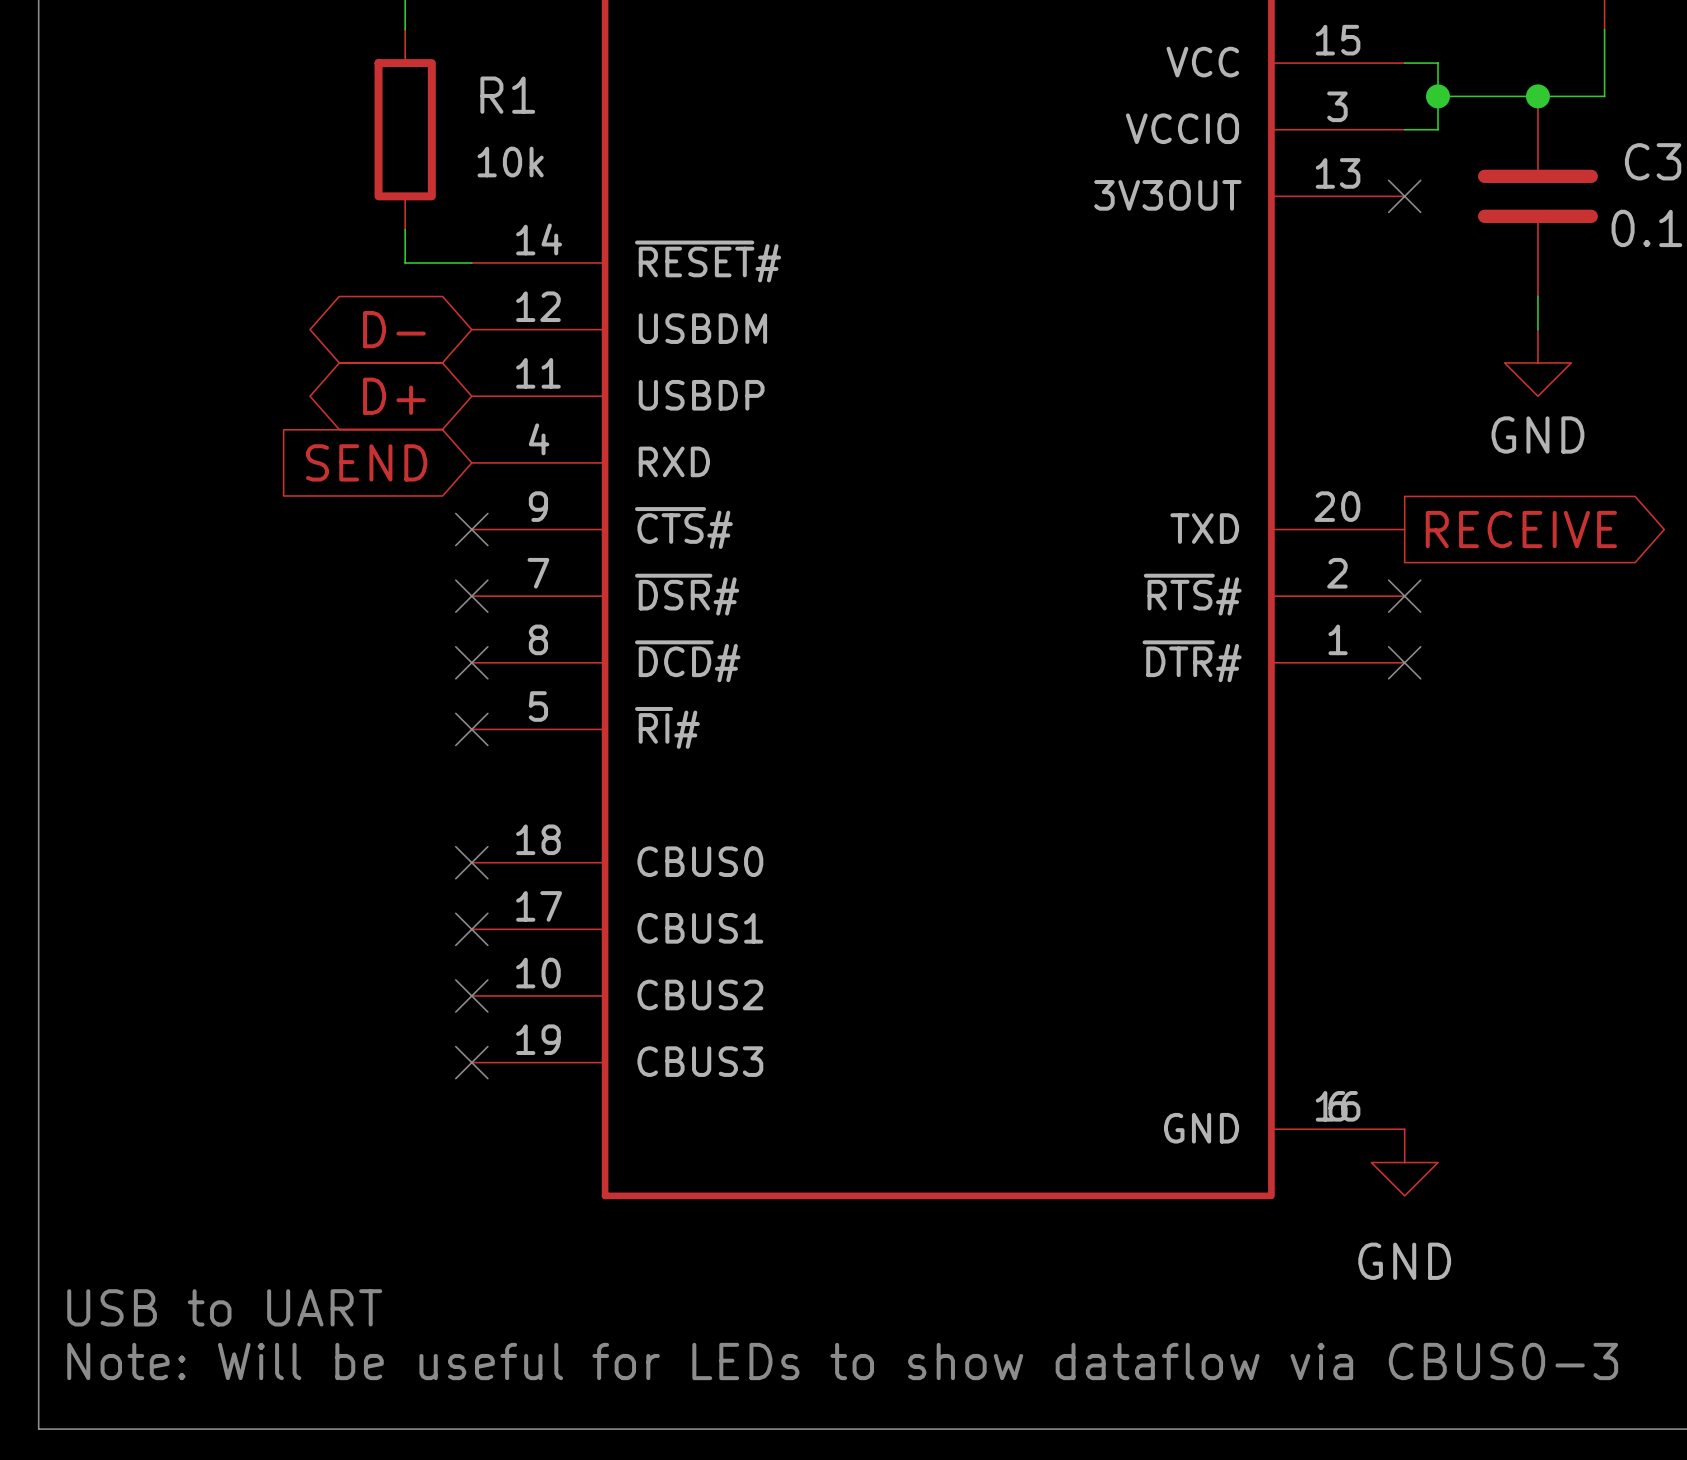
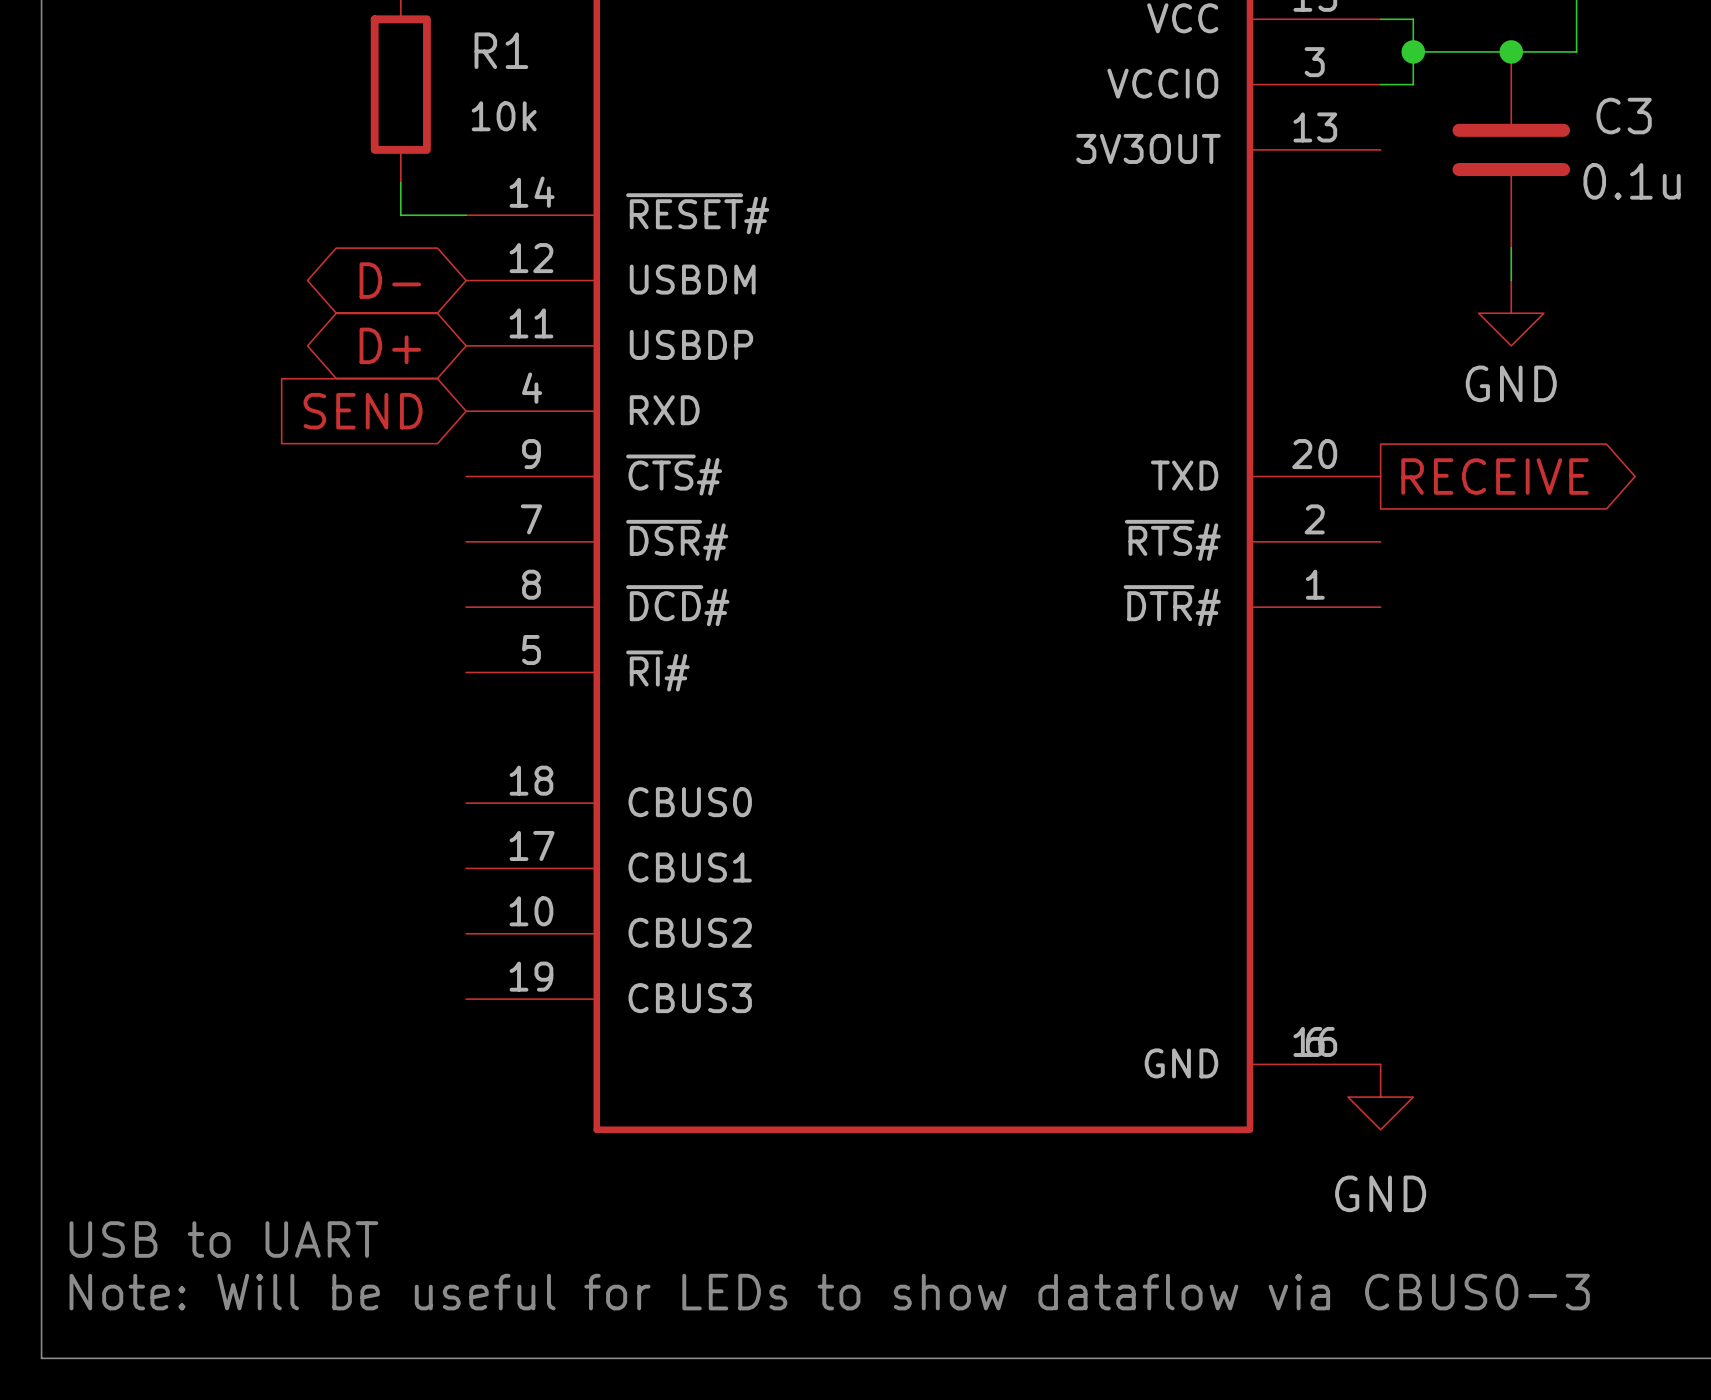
no-connect mark: (1404, 196) -> none
no-connect mark: (471, 529) -> none
no-connect mark: (471, 596) -> none
no-connect mark: (1404, 596) -> none
no-connect mark: (471, 662) -> none
no-connect mark: (1404, 662) -> none
no-connect mark: (471, 729) -> none
no-connect mark: (471, 862) -> none
no-connect mark: (471, 929) -> none
no-connect mark: (471, 995) -> none
no-connect mark: (471, 1062) -> none

